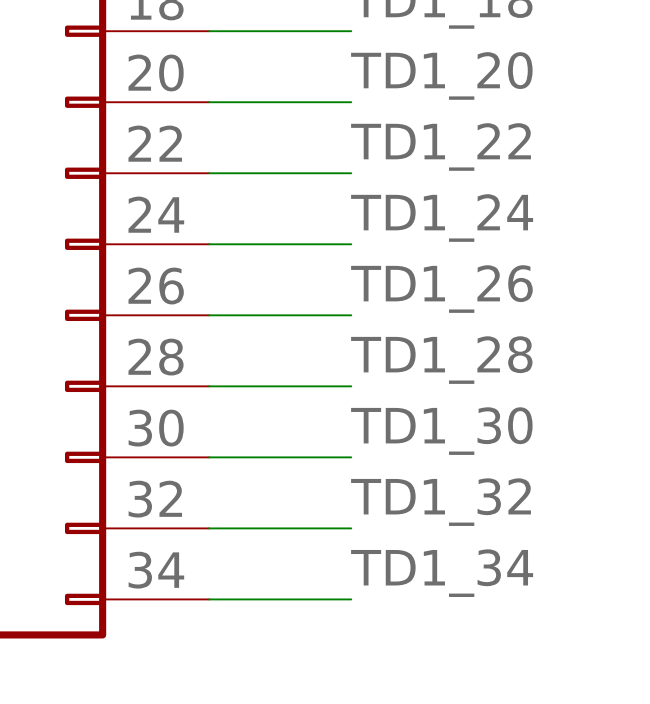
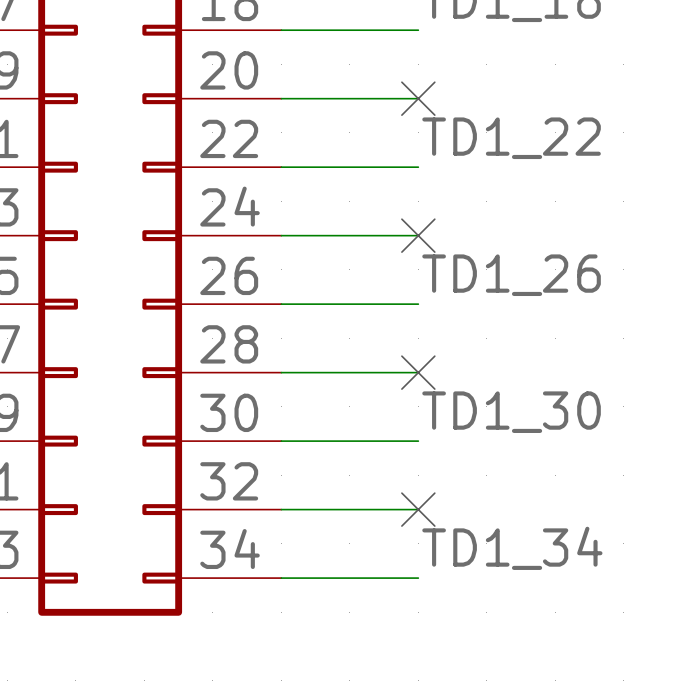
label: TD1_20 (441, 75) -> none
no-connect mark: none -> (418, 98)
label: TD1_24 (442, 218) -> none
no-connect mark: none -> (418, 235)
label: TD1_28 (441, 360) -> none
no-connect mark: none -> (418, 372)
label: TD1_32 (441, 502) -> none
no-connect mark: none -> (418, 509)

